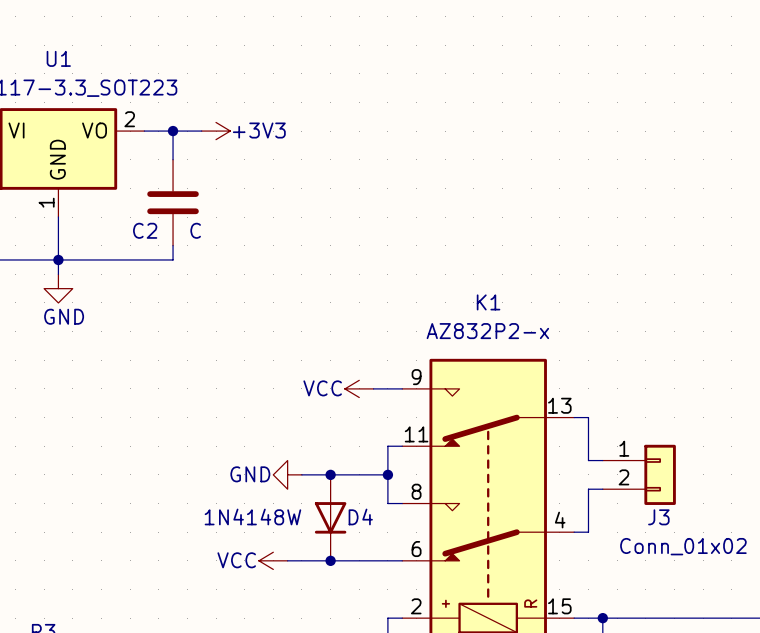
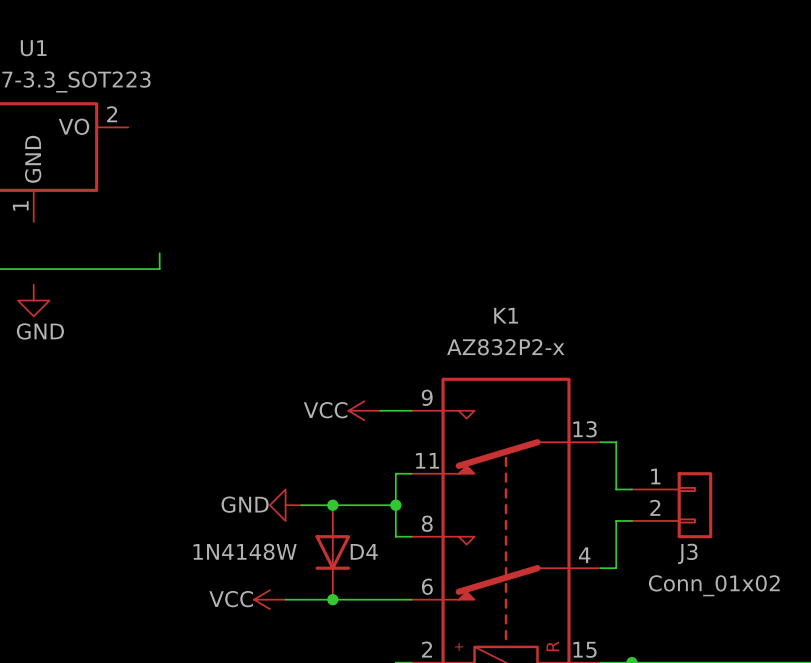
wire: (144, 131) (201, 131) -> none
wire: (173, 131) (173, 159) -> none
junction: (173, 131) -> none
power symbol: +3V3 (216, 131) -> none
C2: C (173, 202) -> none
wire: (58, 217) (58, 274) -> none
junction: (58, 259) -> none

